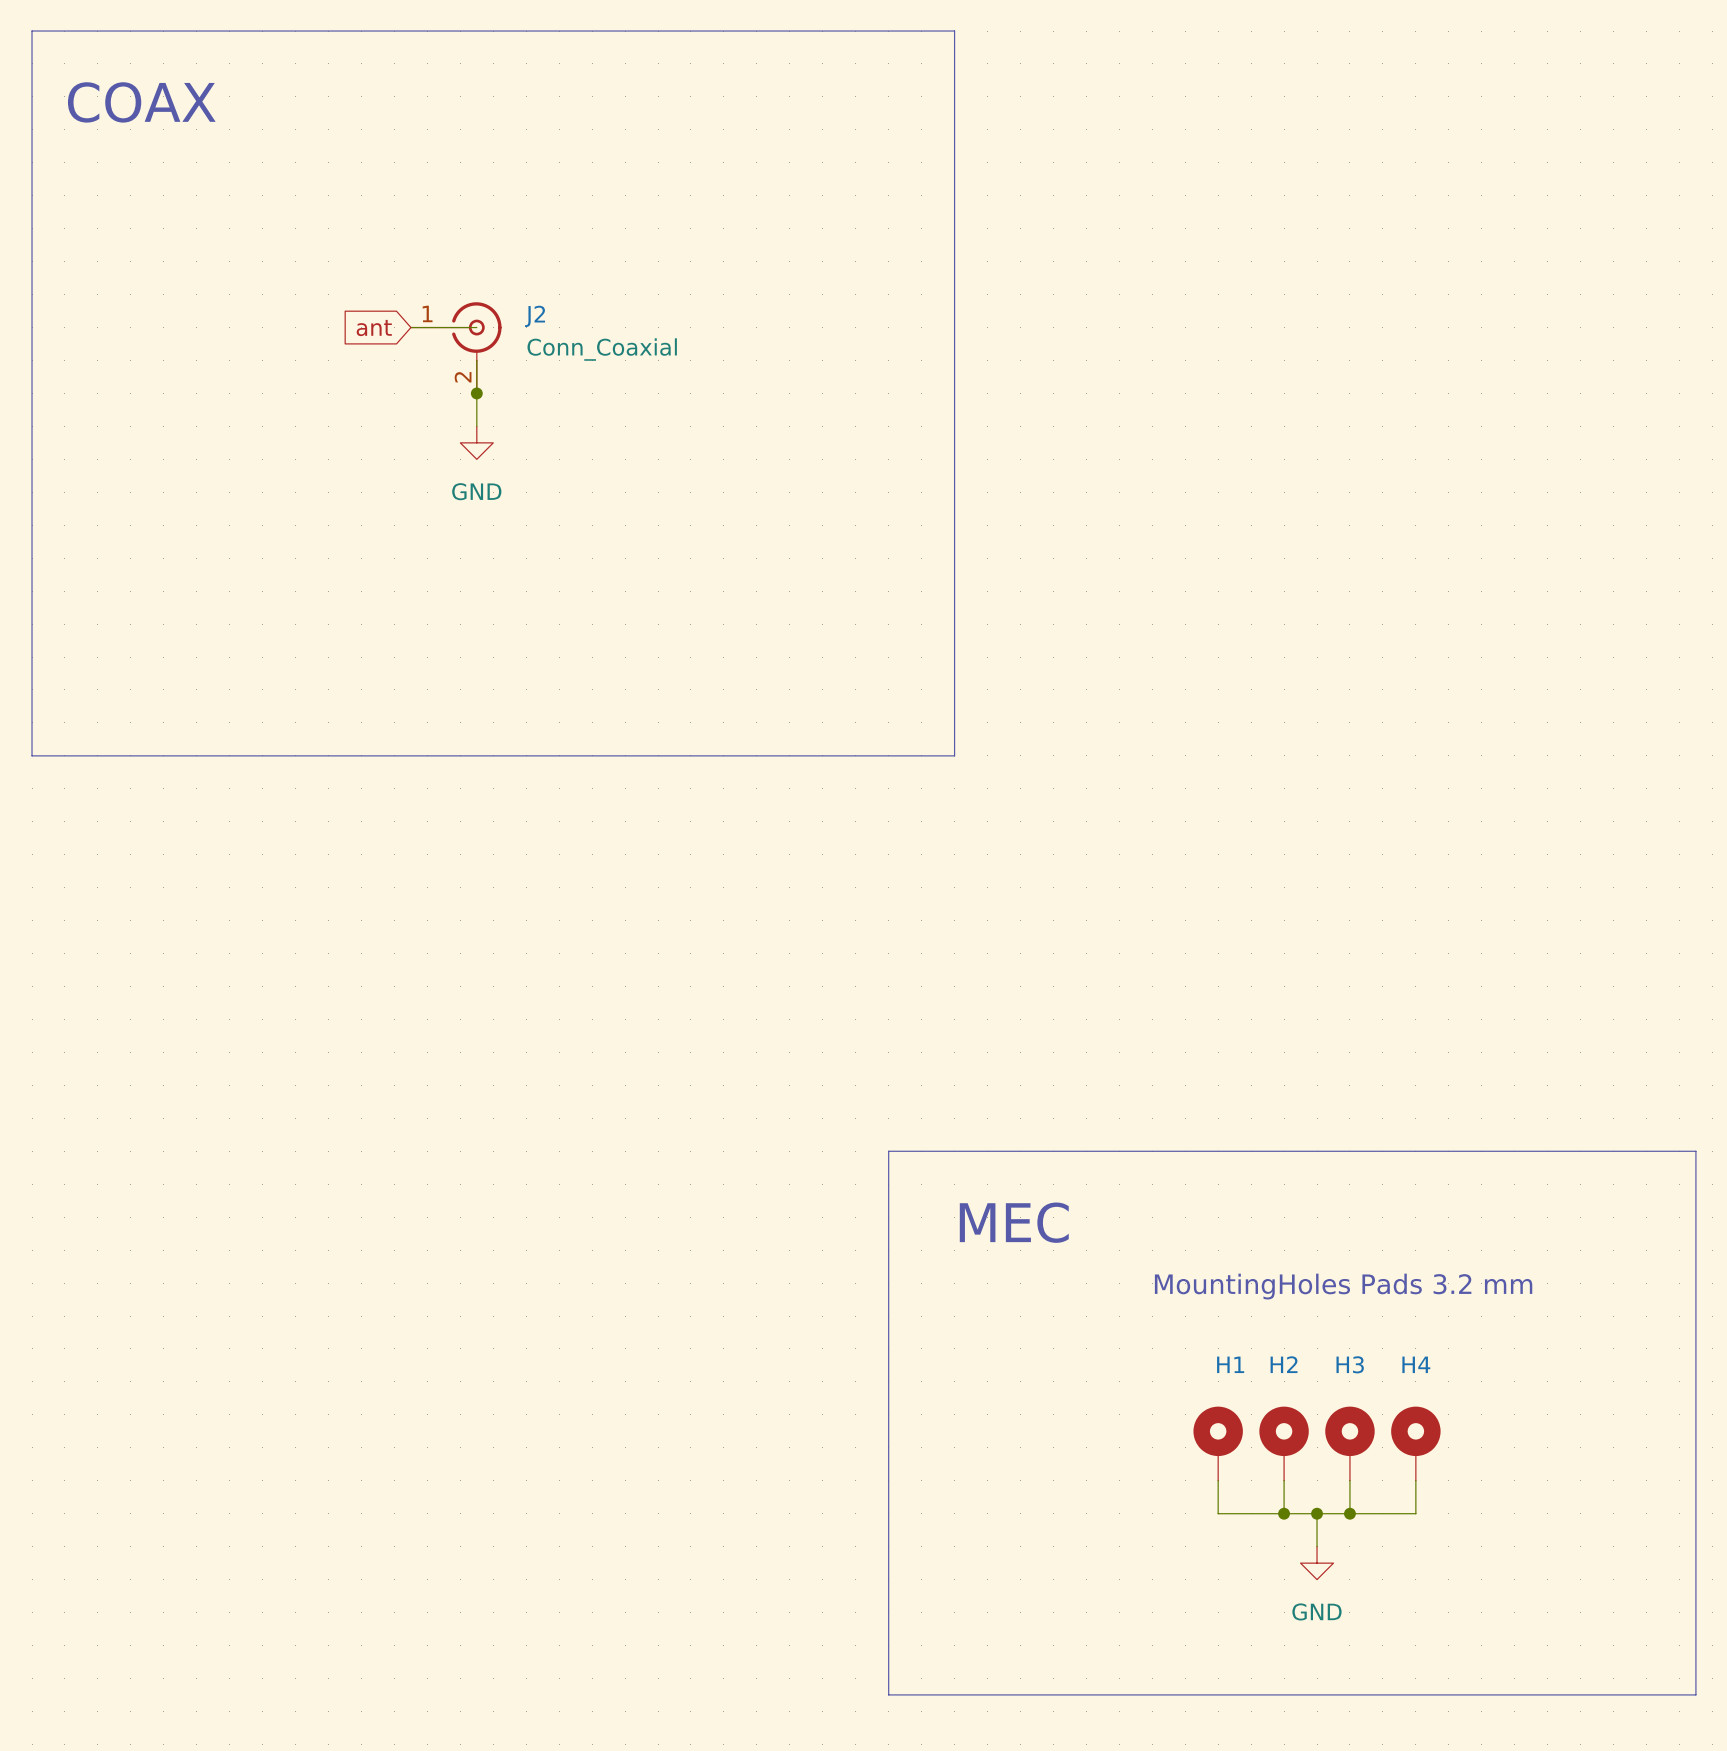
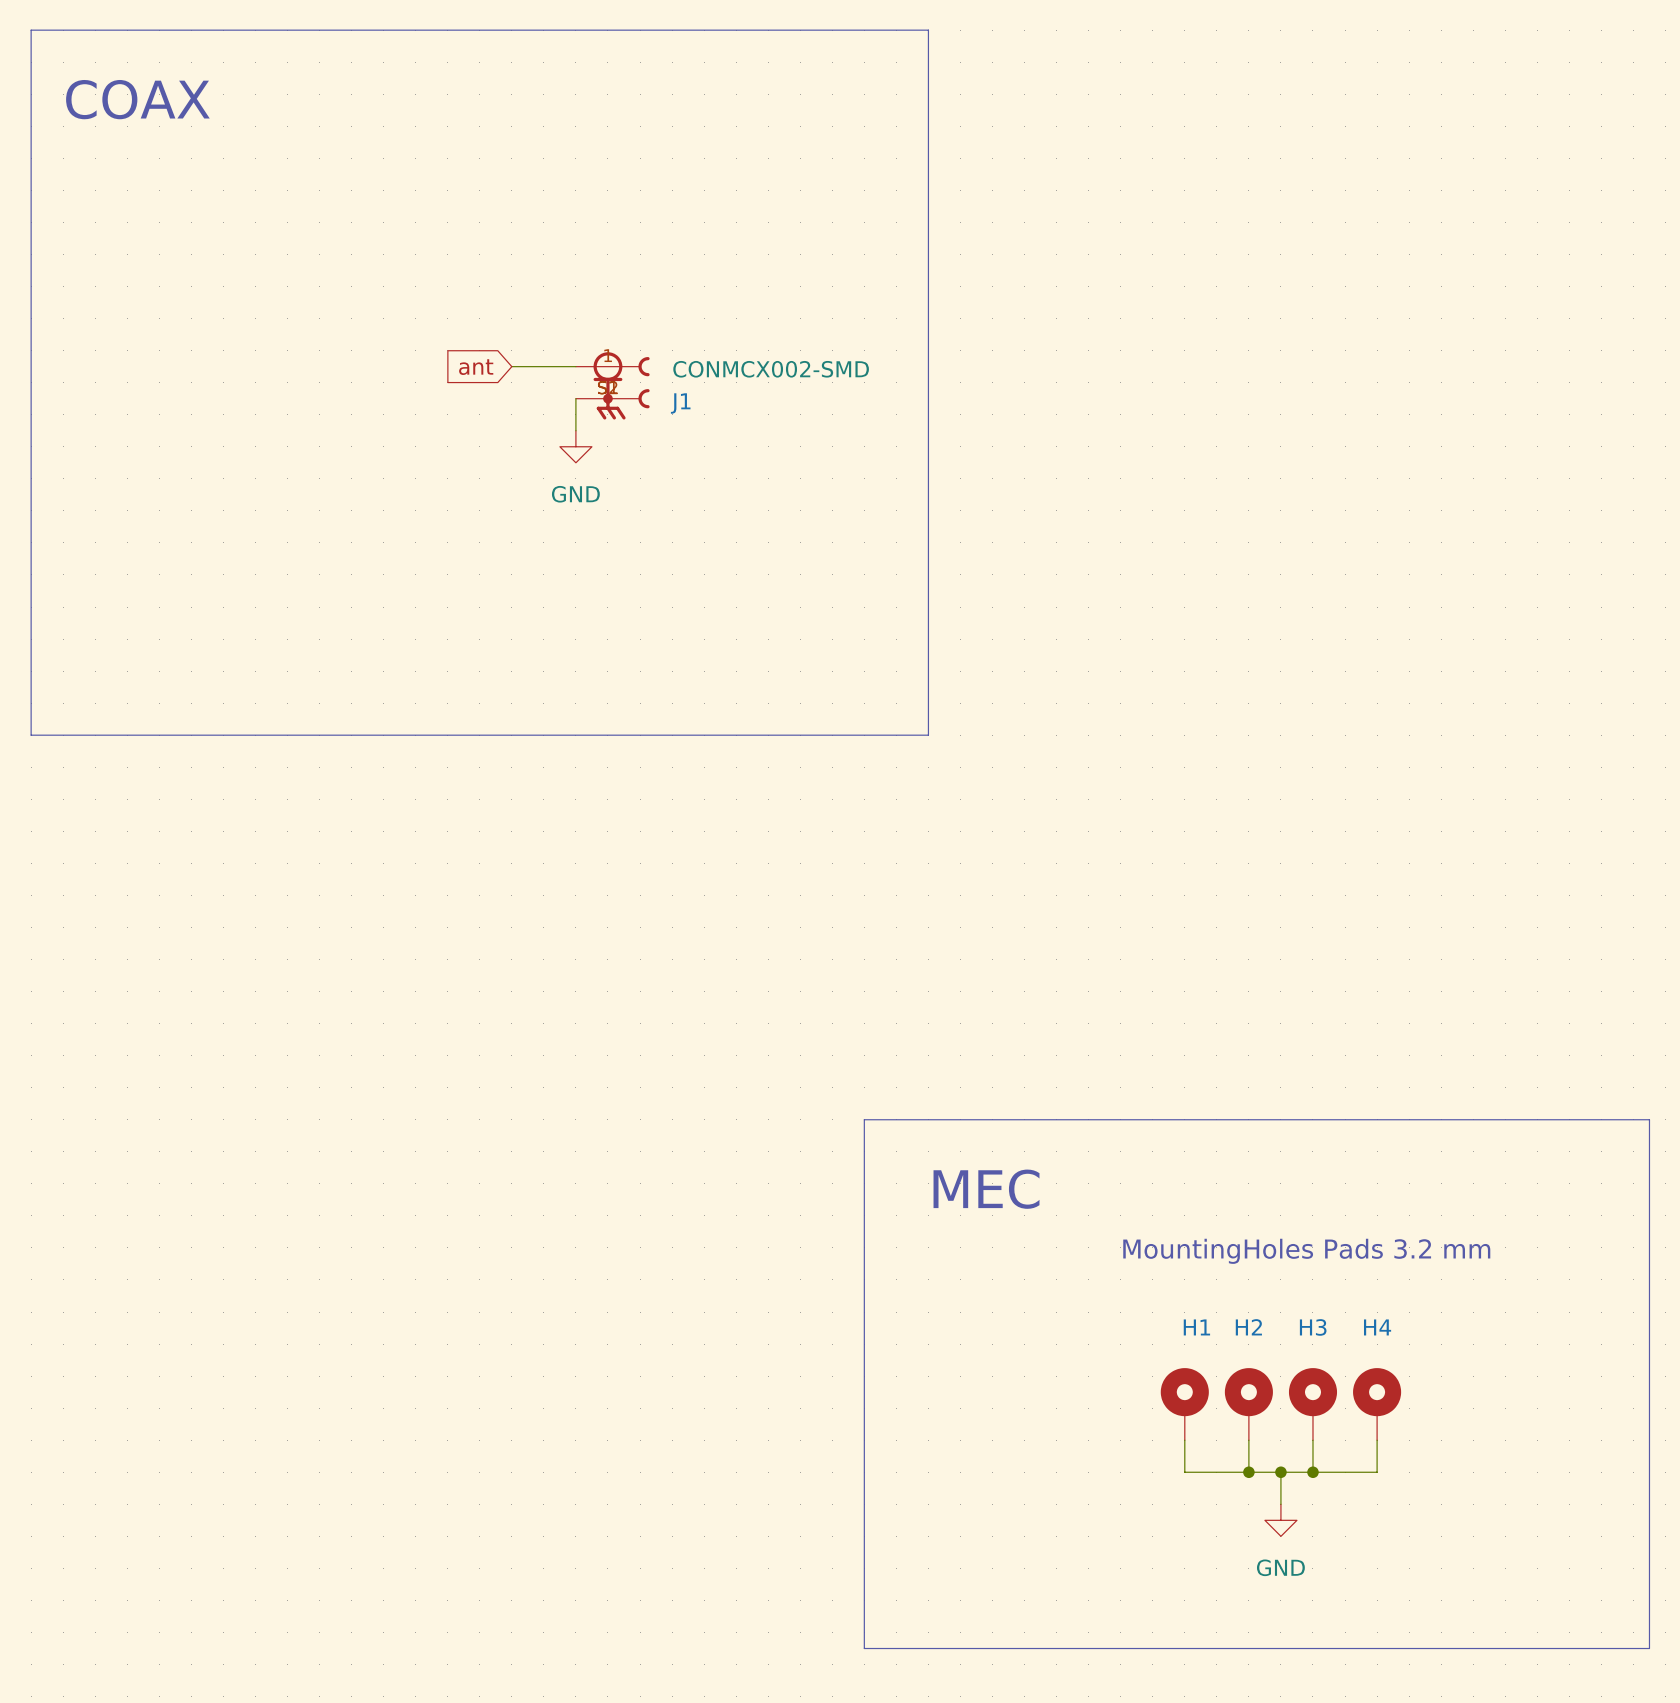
wire: (410, 327) (476, 327) -> (511, 366) (575, 366)
global label position: ant (374, 328) -> ant (476, 367)
J2: Conn_Coaxial (456, 347) -> none
wire: (476, 360) (476, 426) -> none
junction: (476, 393) -> none
J1: none -> CONMCX002-SMD (612, 385)
wire: none -> (575, 398) (575, 430)
power symbol position: GND (476, 442) -> GND (575, 446)

